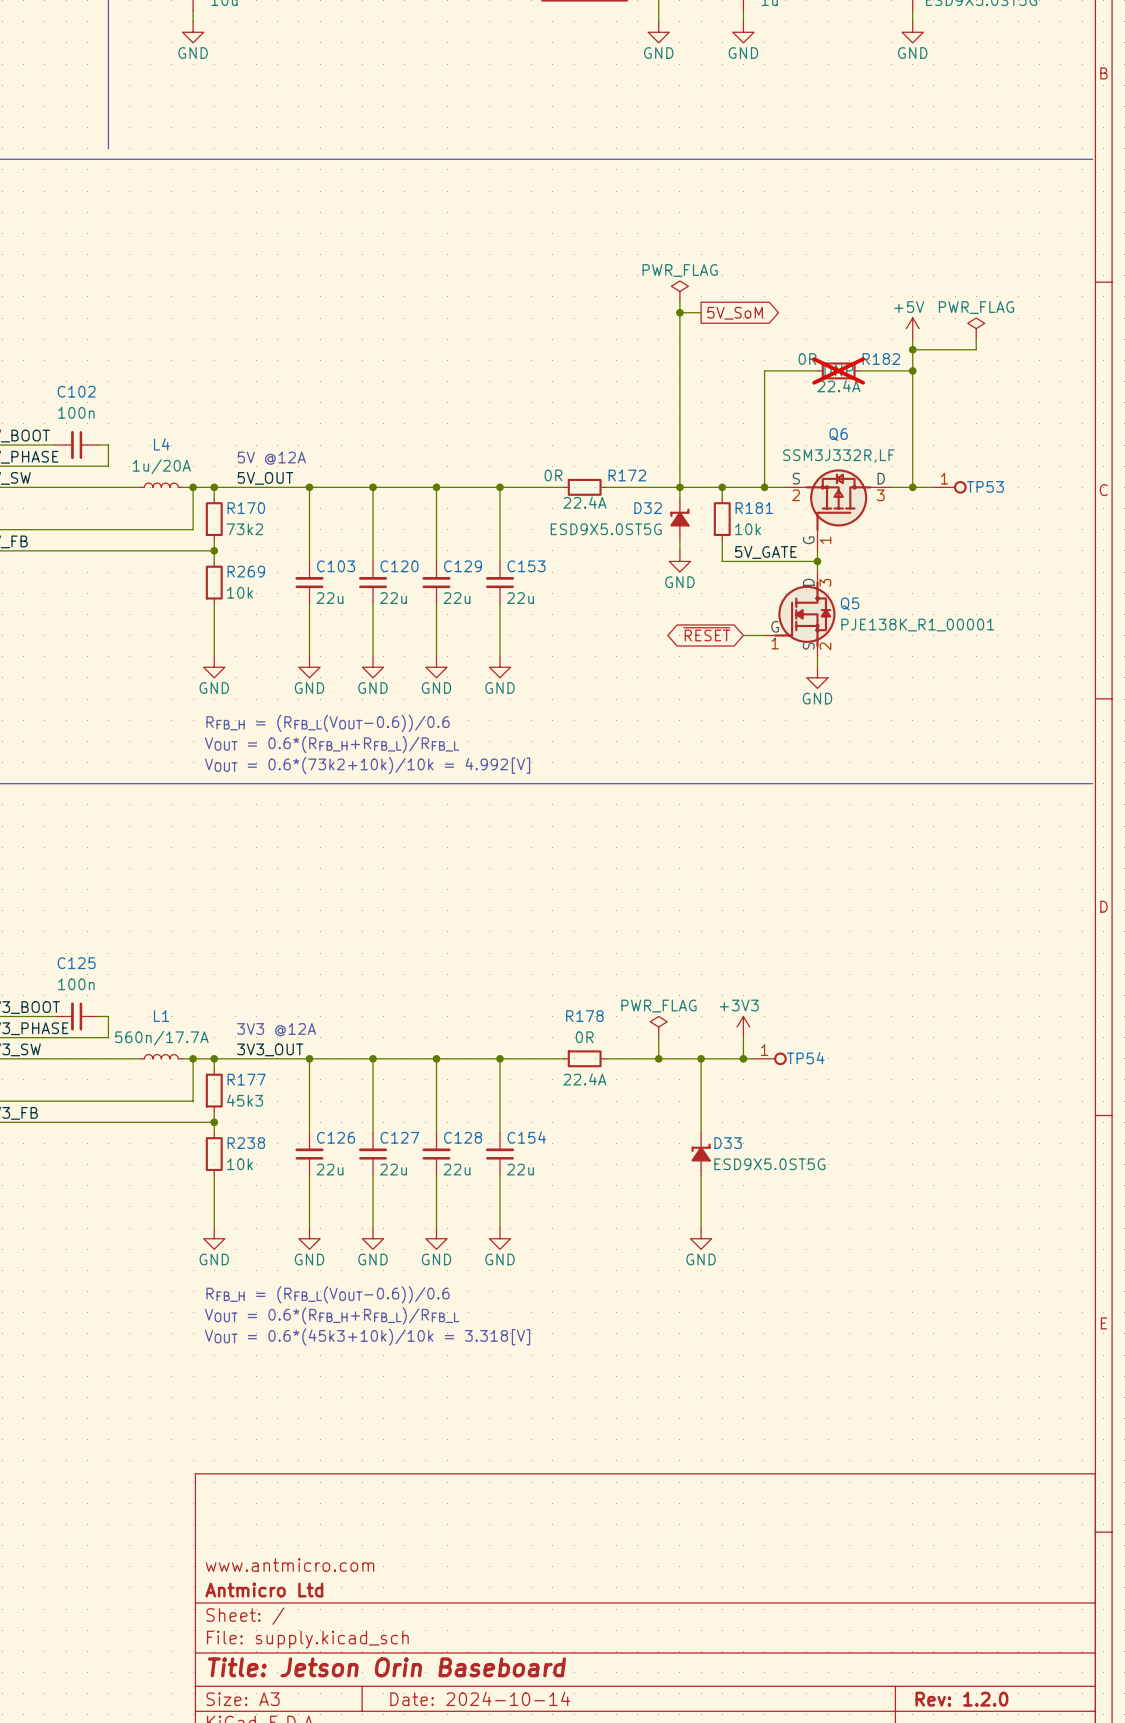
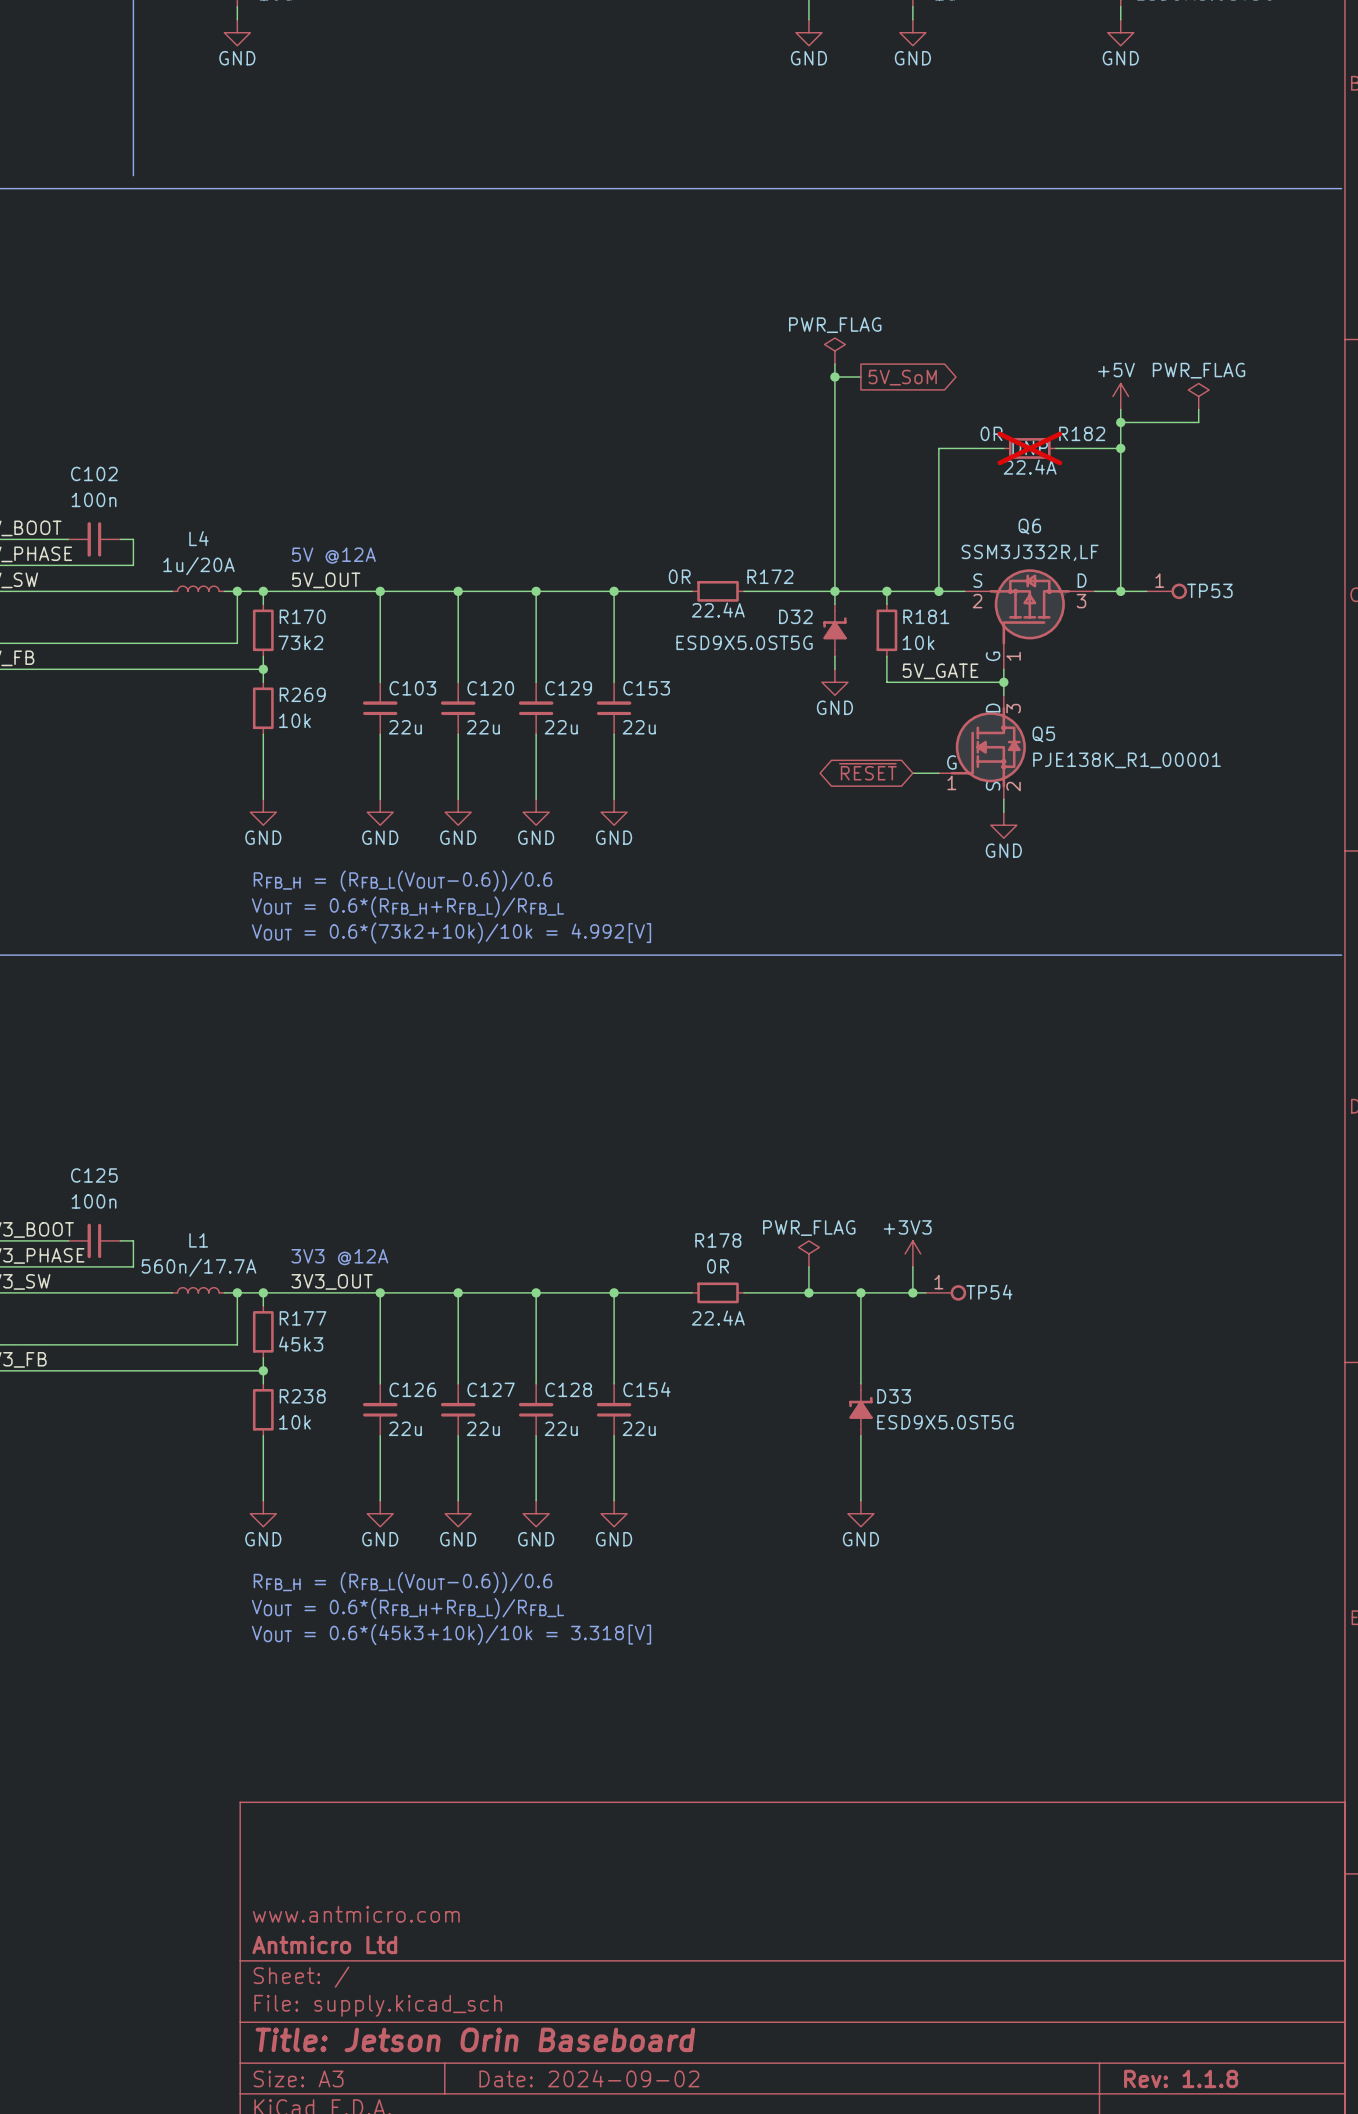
title block: Date: 2024-10-14 (480, 1698) -> Date: 2024-09-02 (589, 2078)
title block: Rev: 1.2.0 (961, 1699) -> Rev: 1.1.8 (1181, 2078)

